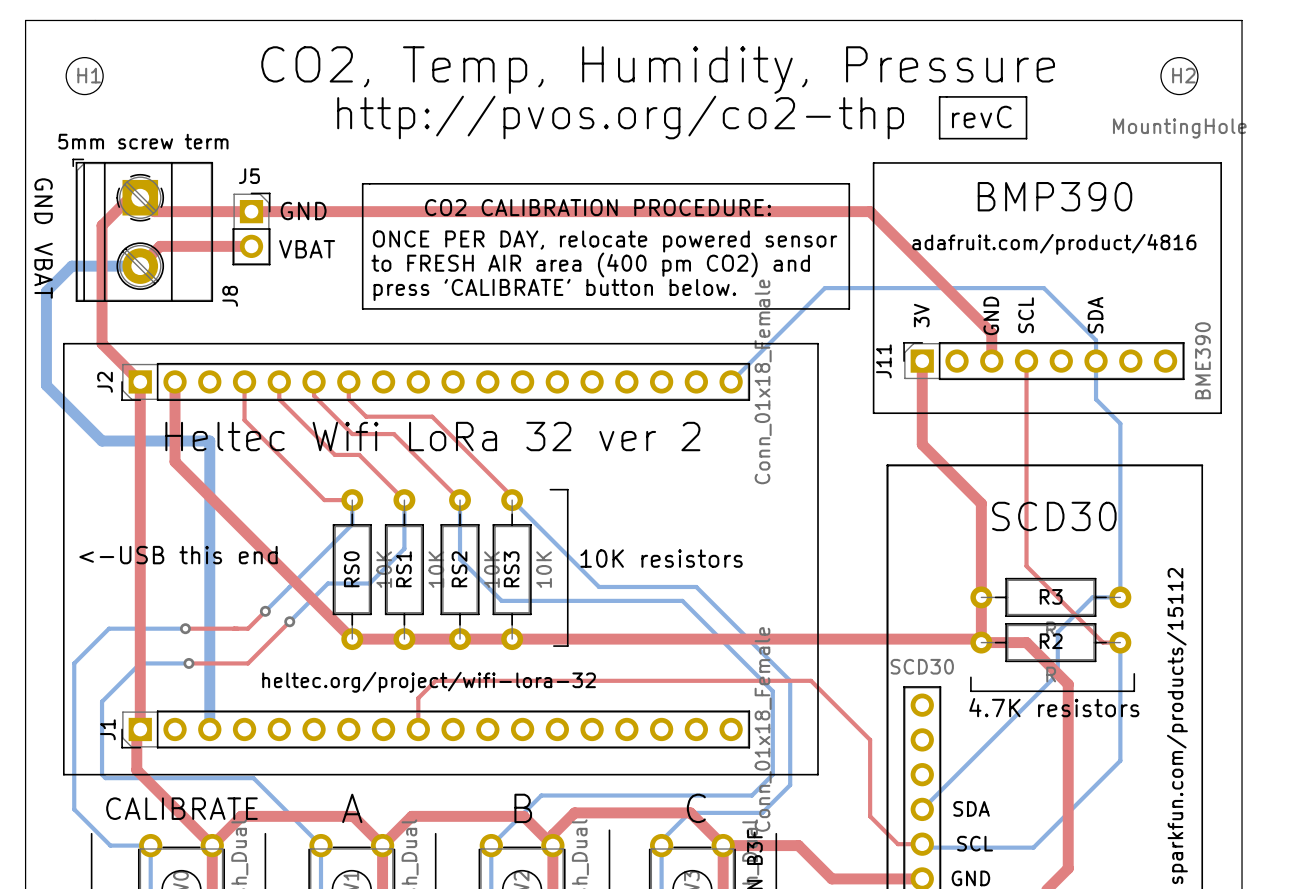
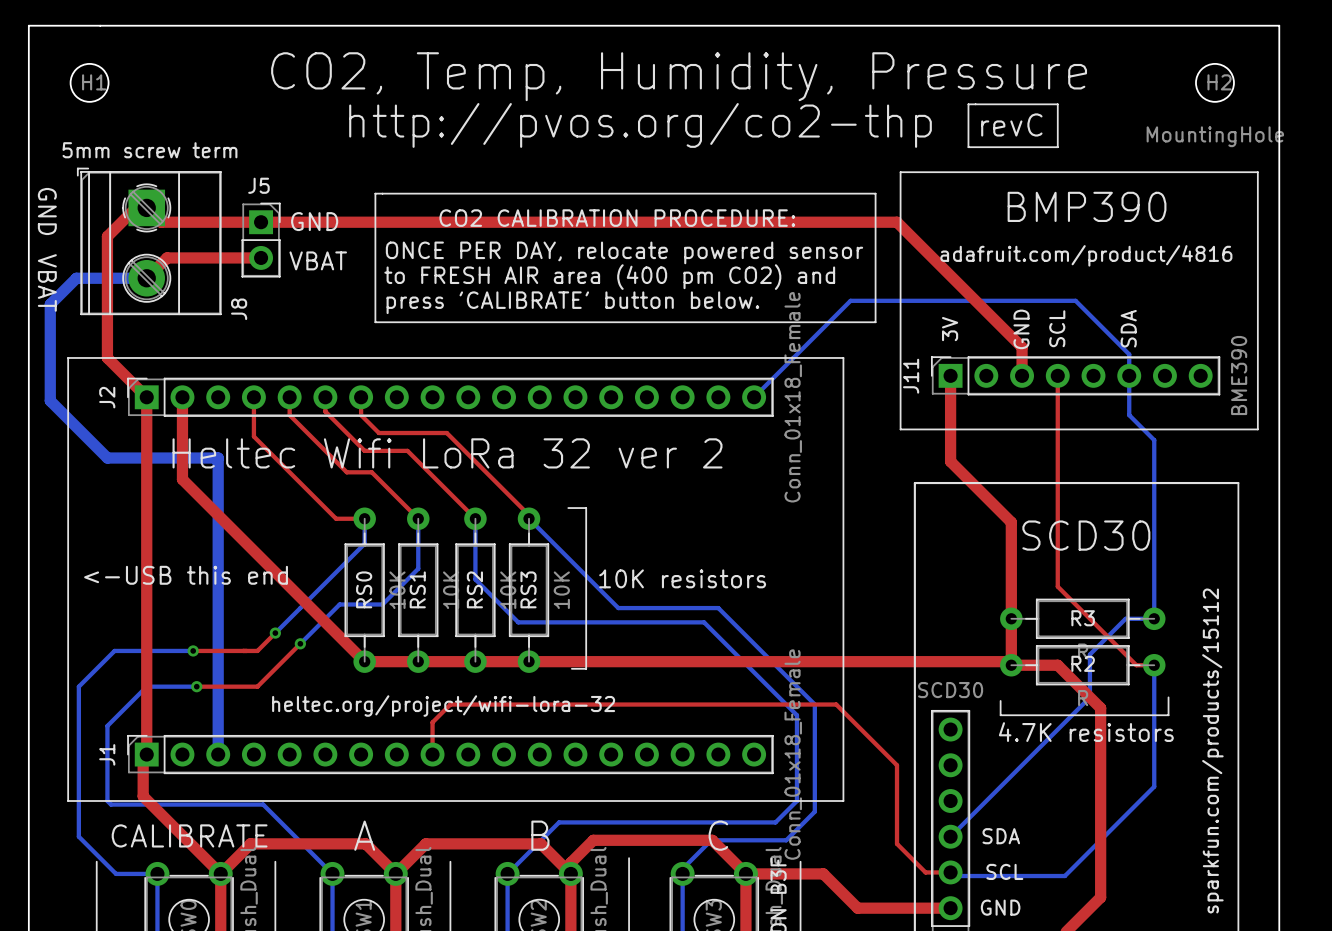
J2 footprint: [121, 362, 751, 401] -> [127, 377, 774, 417]
J1 footprint: [121, 710, 751, 749] -> [127, 735, 774, 775]

